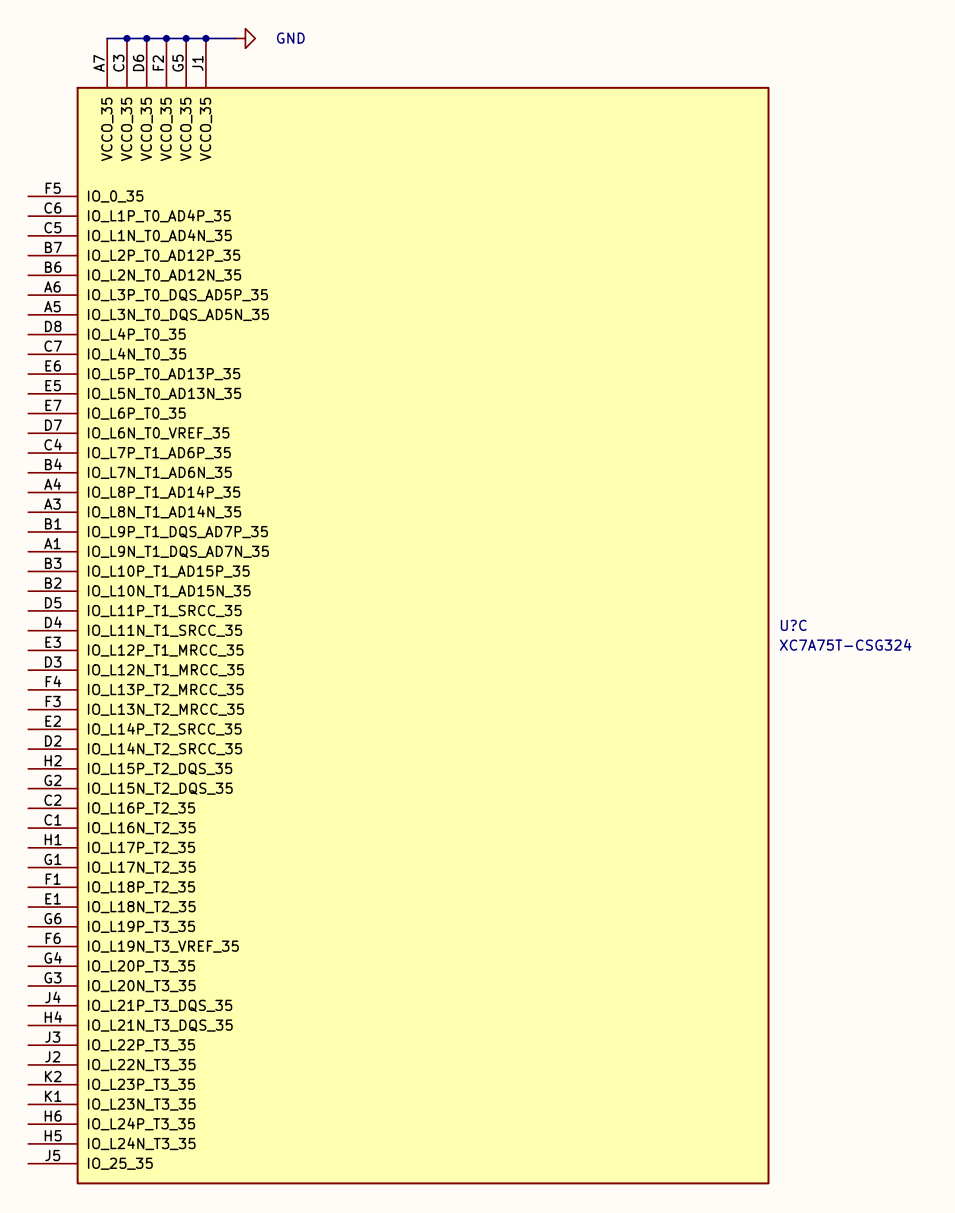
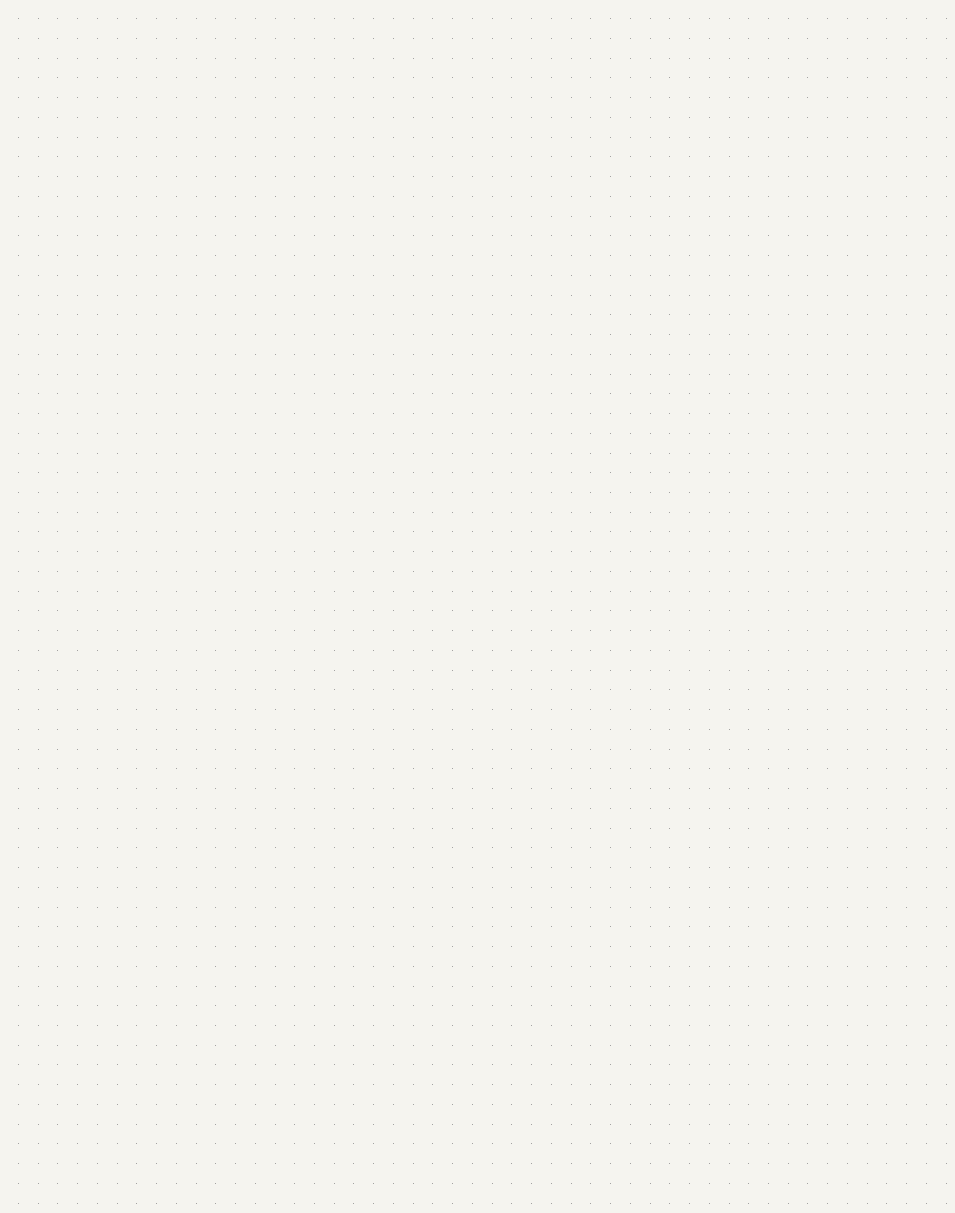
wire: (107, 38) (235, 38) -> none
junction: (126, 38) -> none
junction: (146, 38) -> none
junction: (166, 38) -> none
junction: (186, 38) -> none
junction: (205, 38) -> none
power symbol: GND (245, 38) -> none
U?C: XC7A75T-CSG324 (398, 611) -> none

